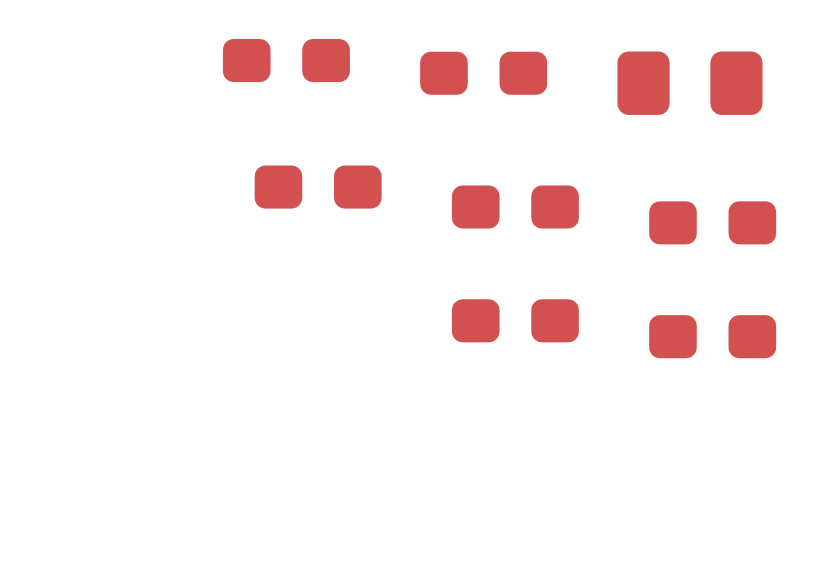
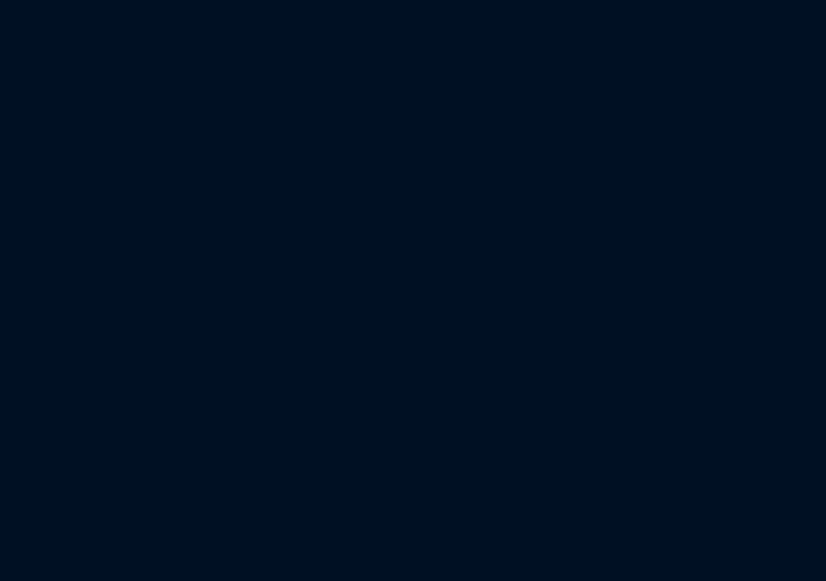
part: (286, 60) -> none
part: (483, 73) -> none
part: (689, 83) -> none
part: (318, 187) -> none
part: (515, 206) -> none
part: (712, 222) -> none
part: (515, 320) -> none
part: (712, 336) -> none

